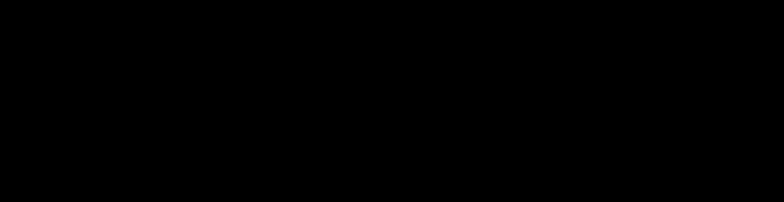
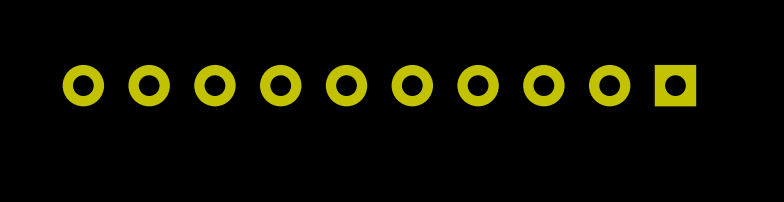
part: none -> (379, 85)

